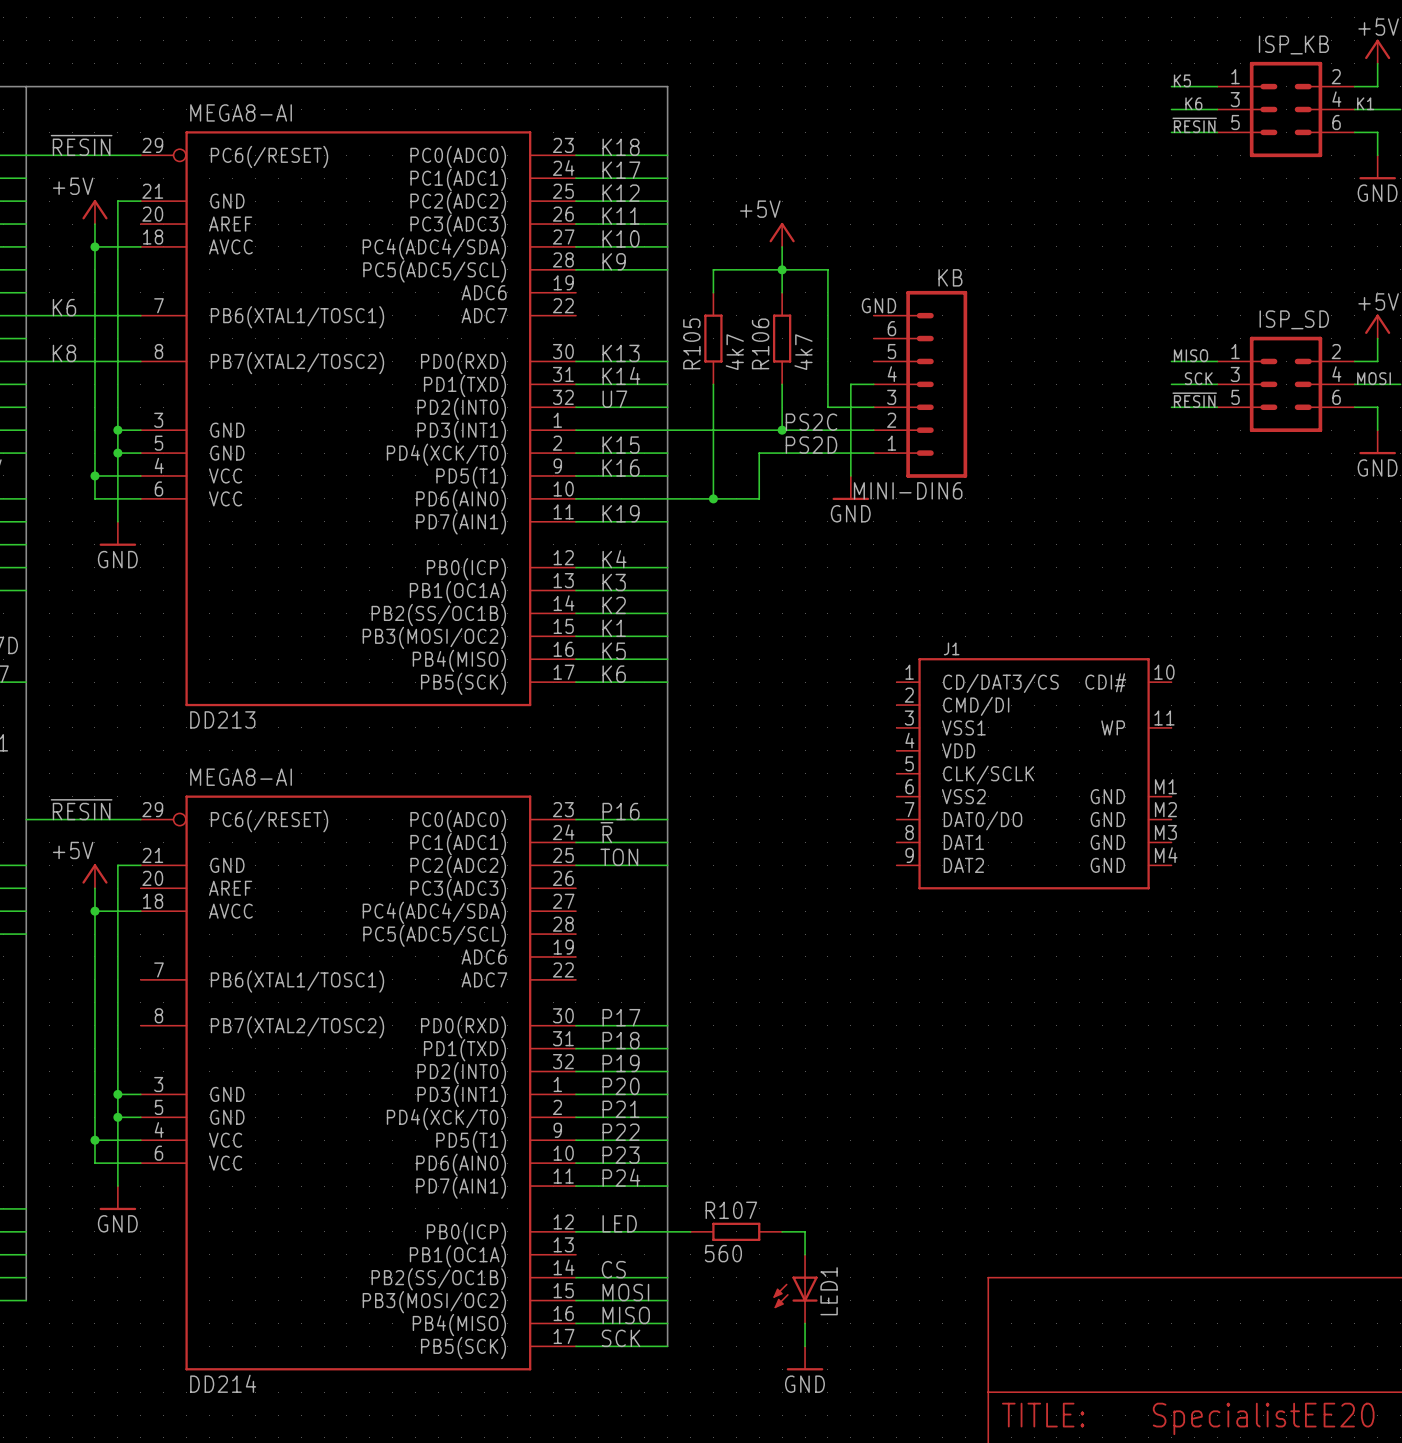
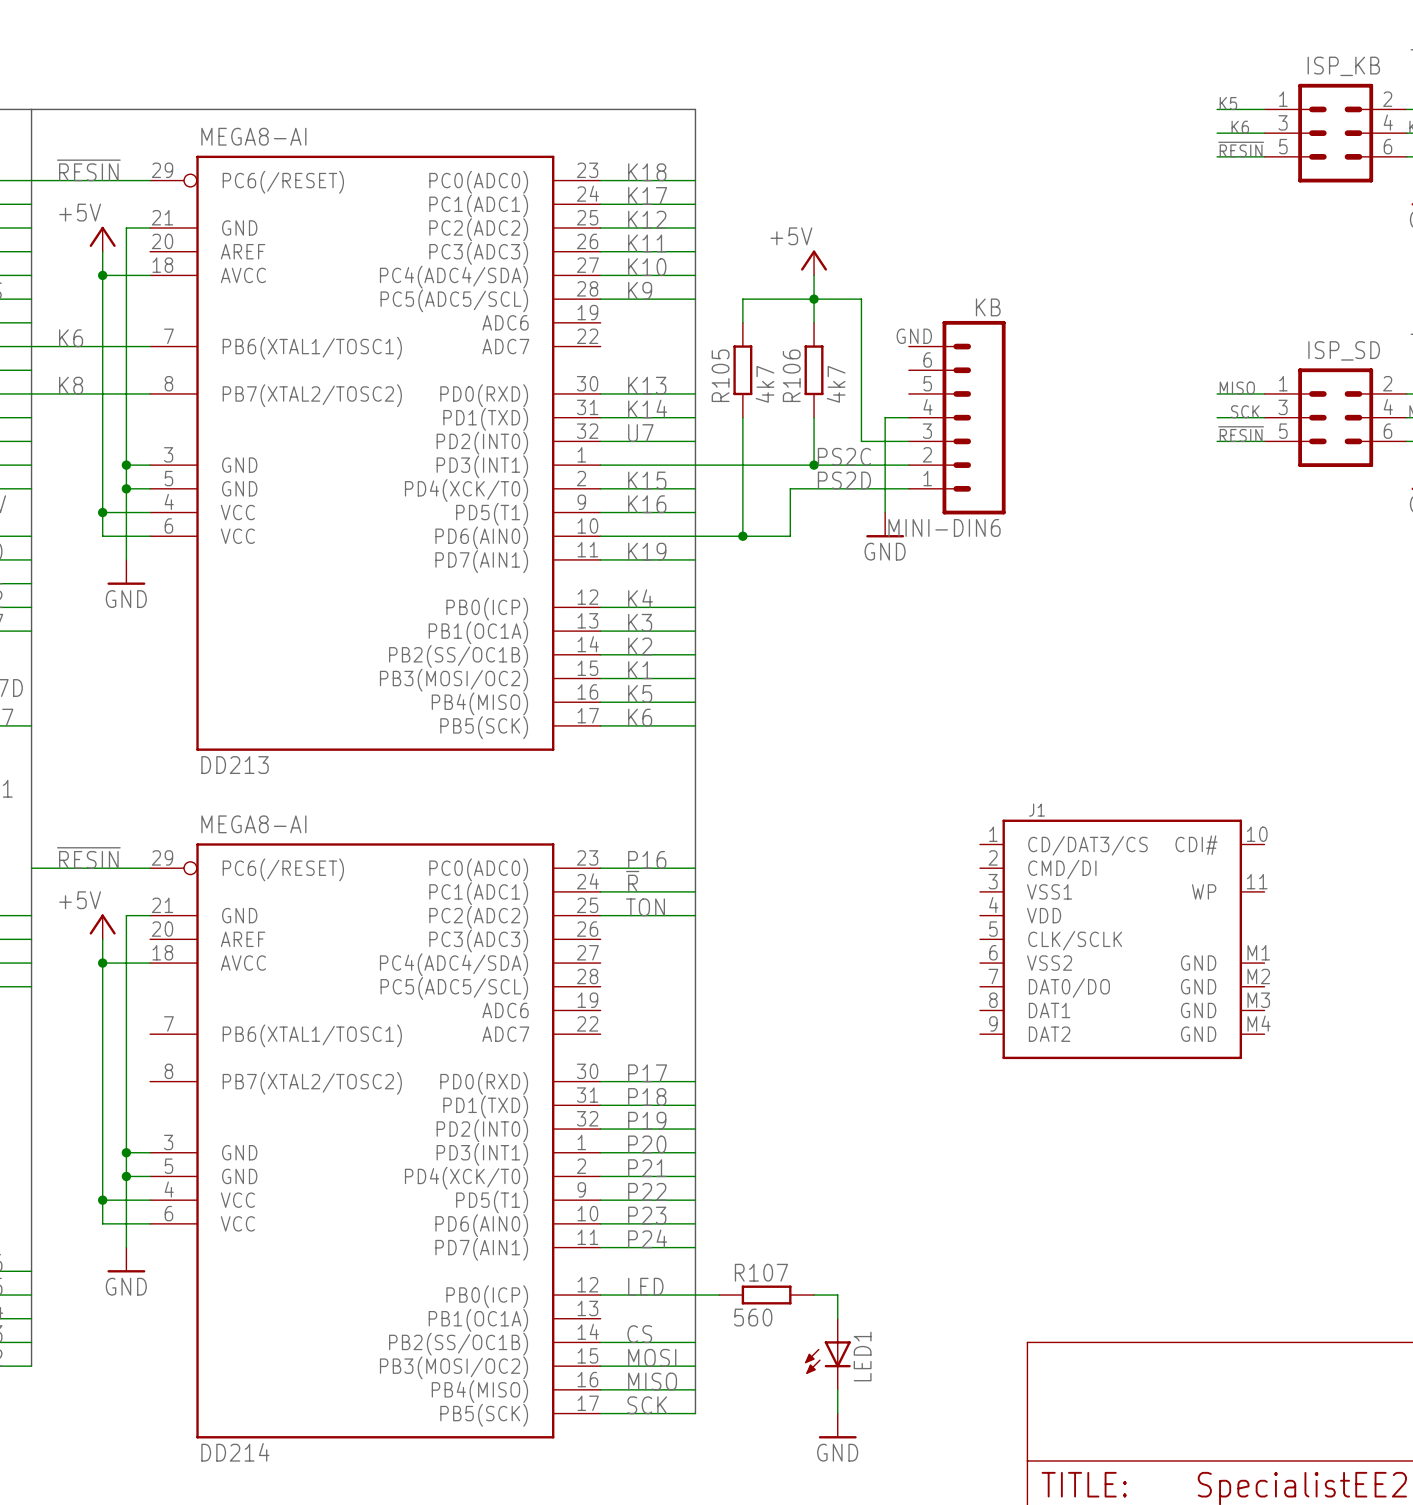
J1 position: (1034, 773) -> (1122, 939)

